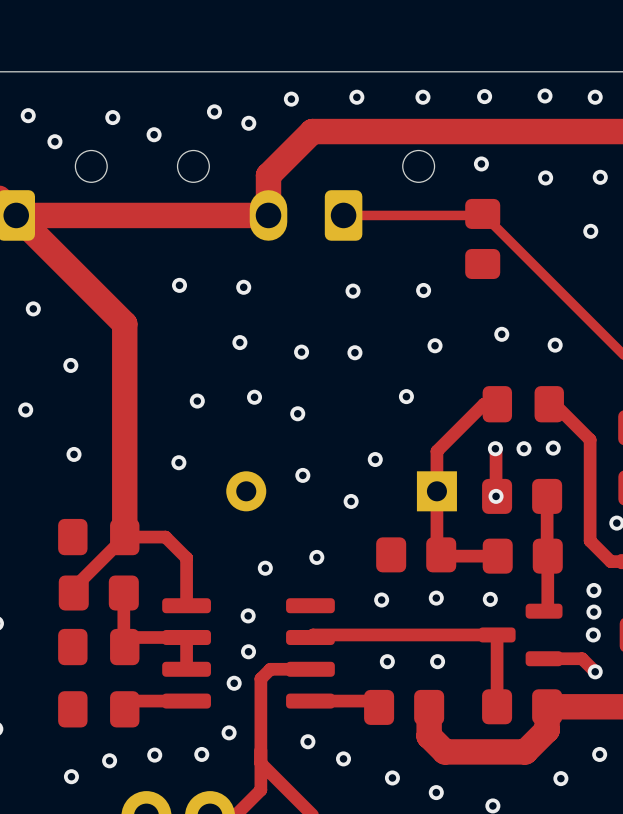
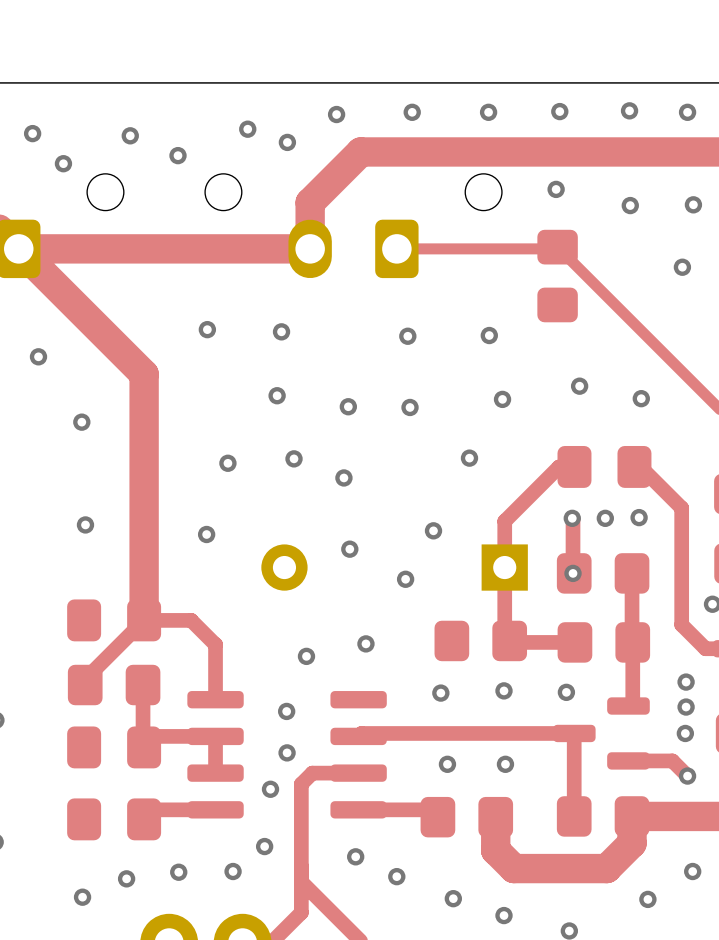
via: (25, 409) -> none

